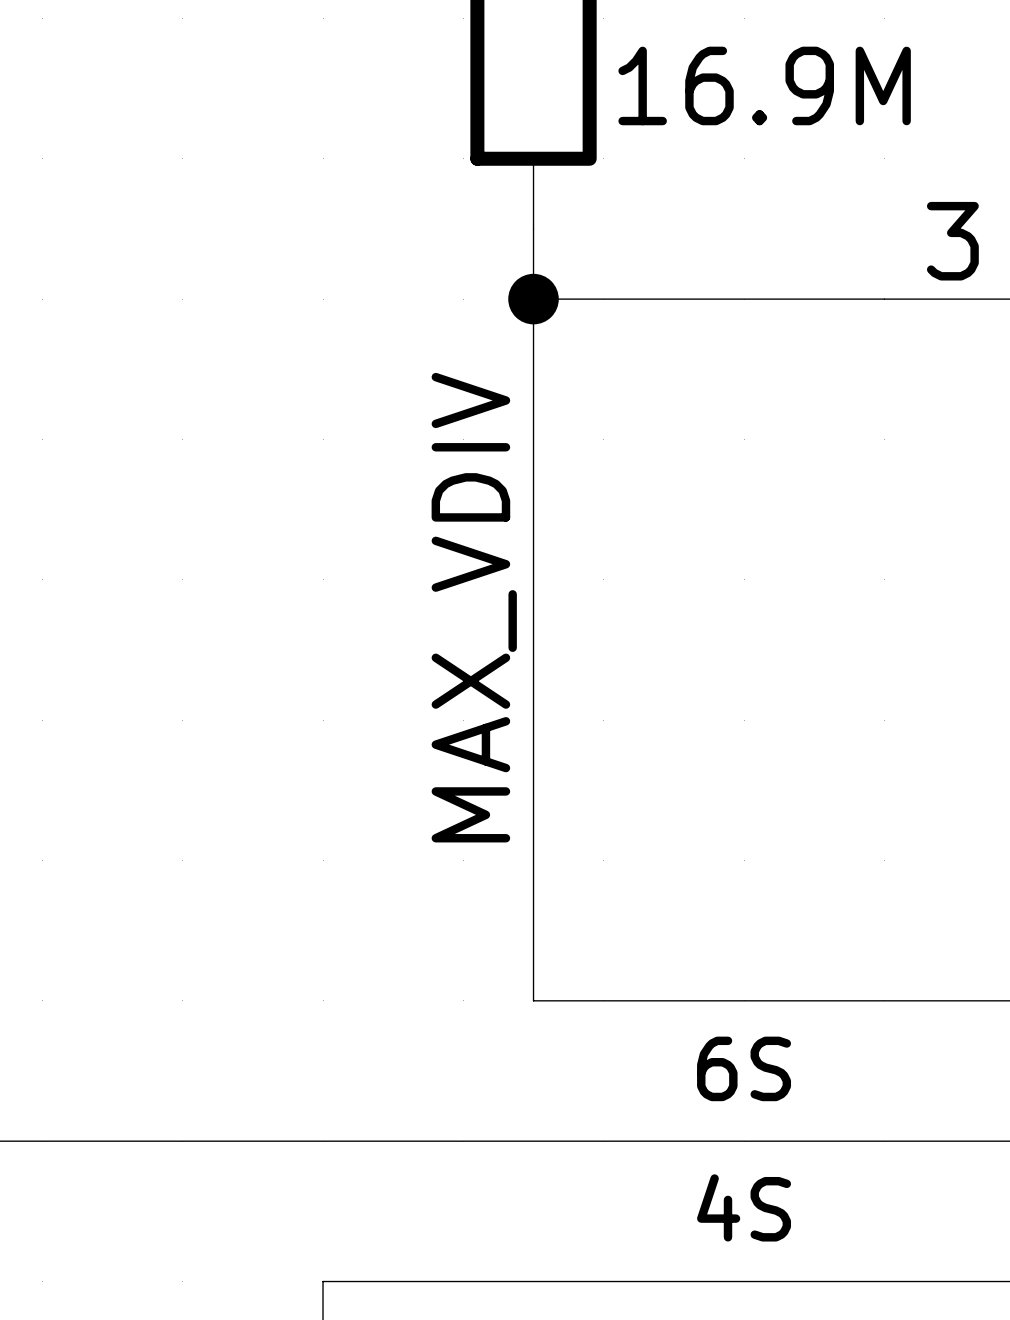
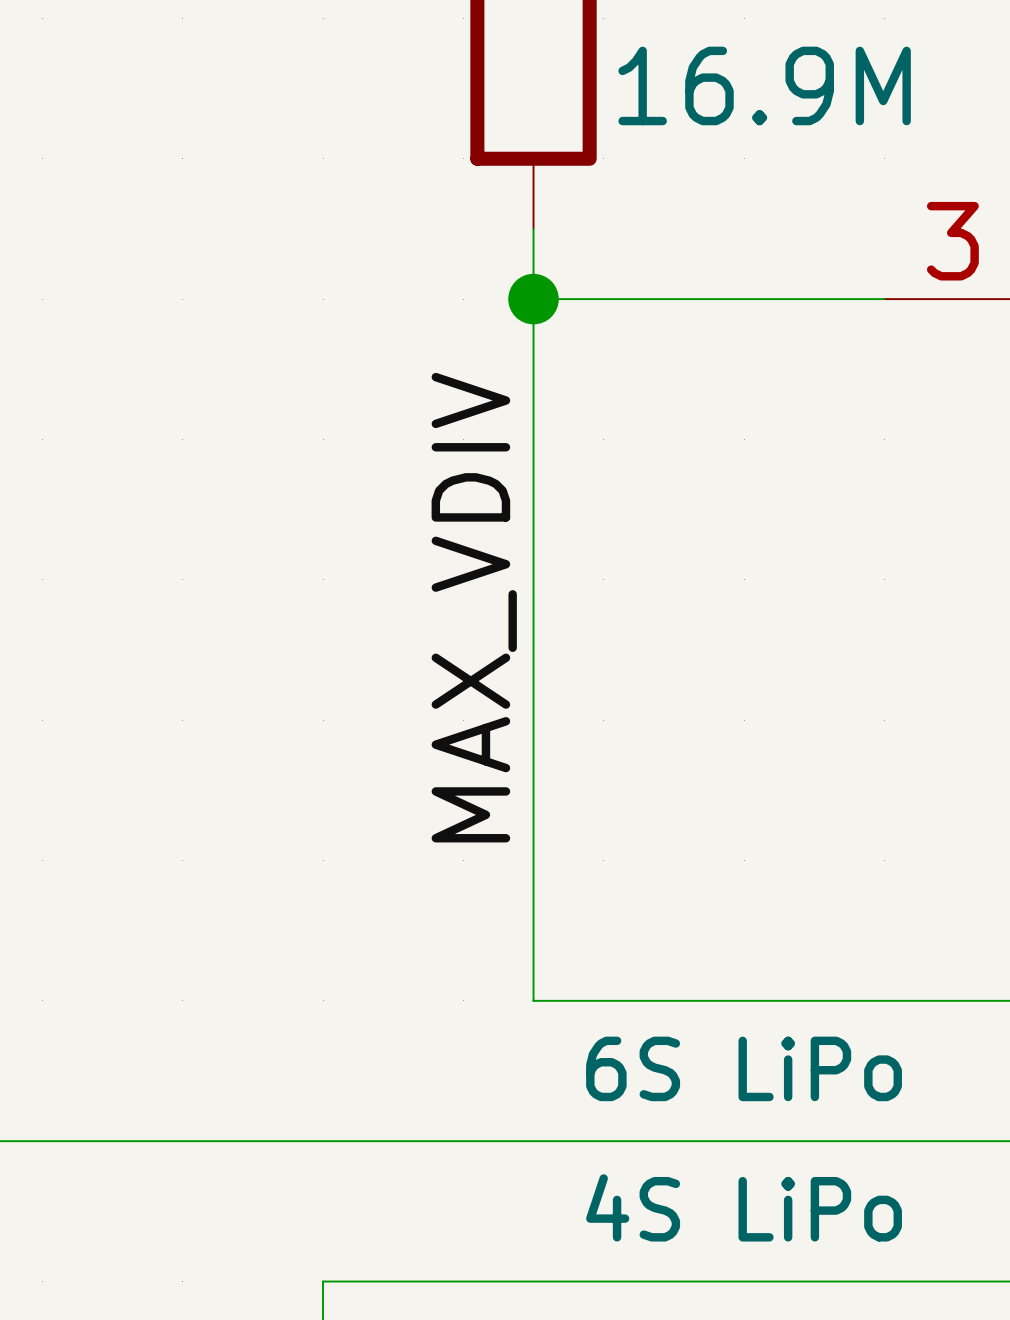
part value: 6S (744, 1068) -> 6S LiPo (744, 1068)
part value: 4S (744, 1207) -> 4S LiPo (744, 1207)

